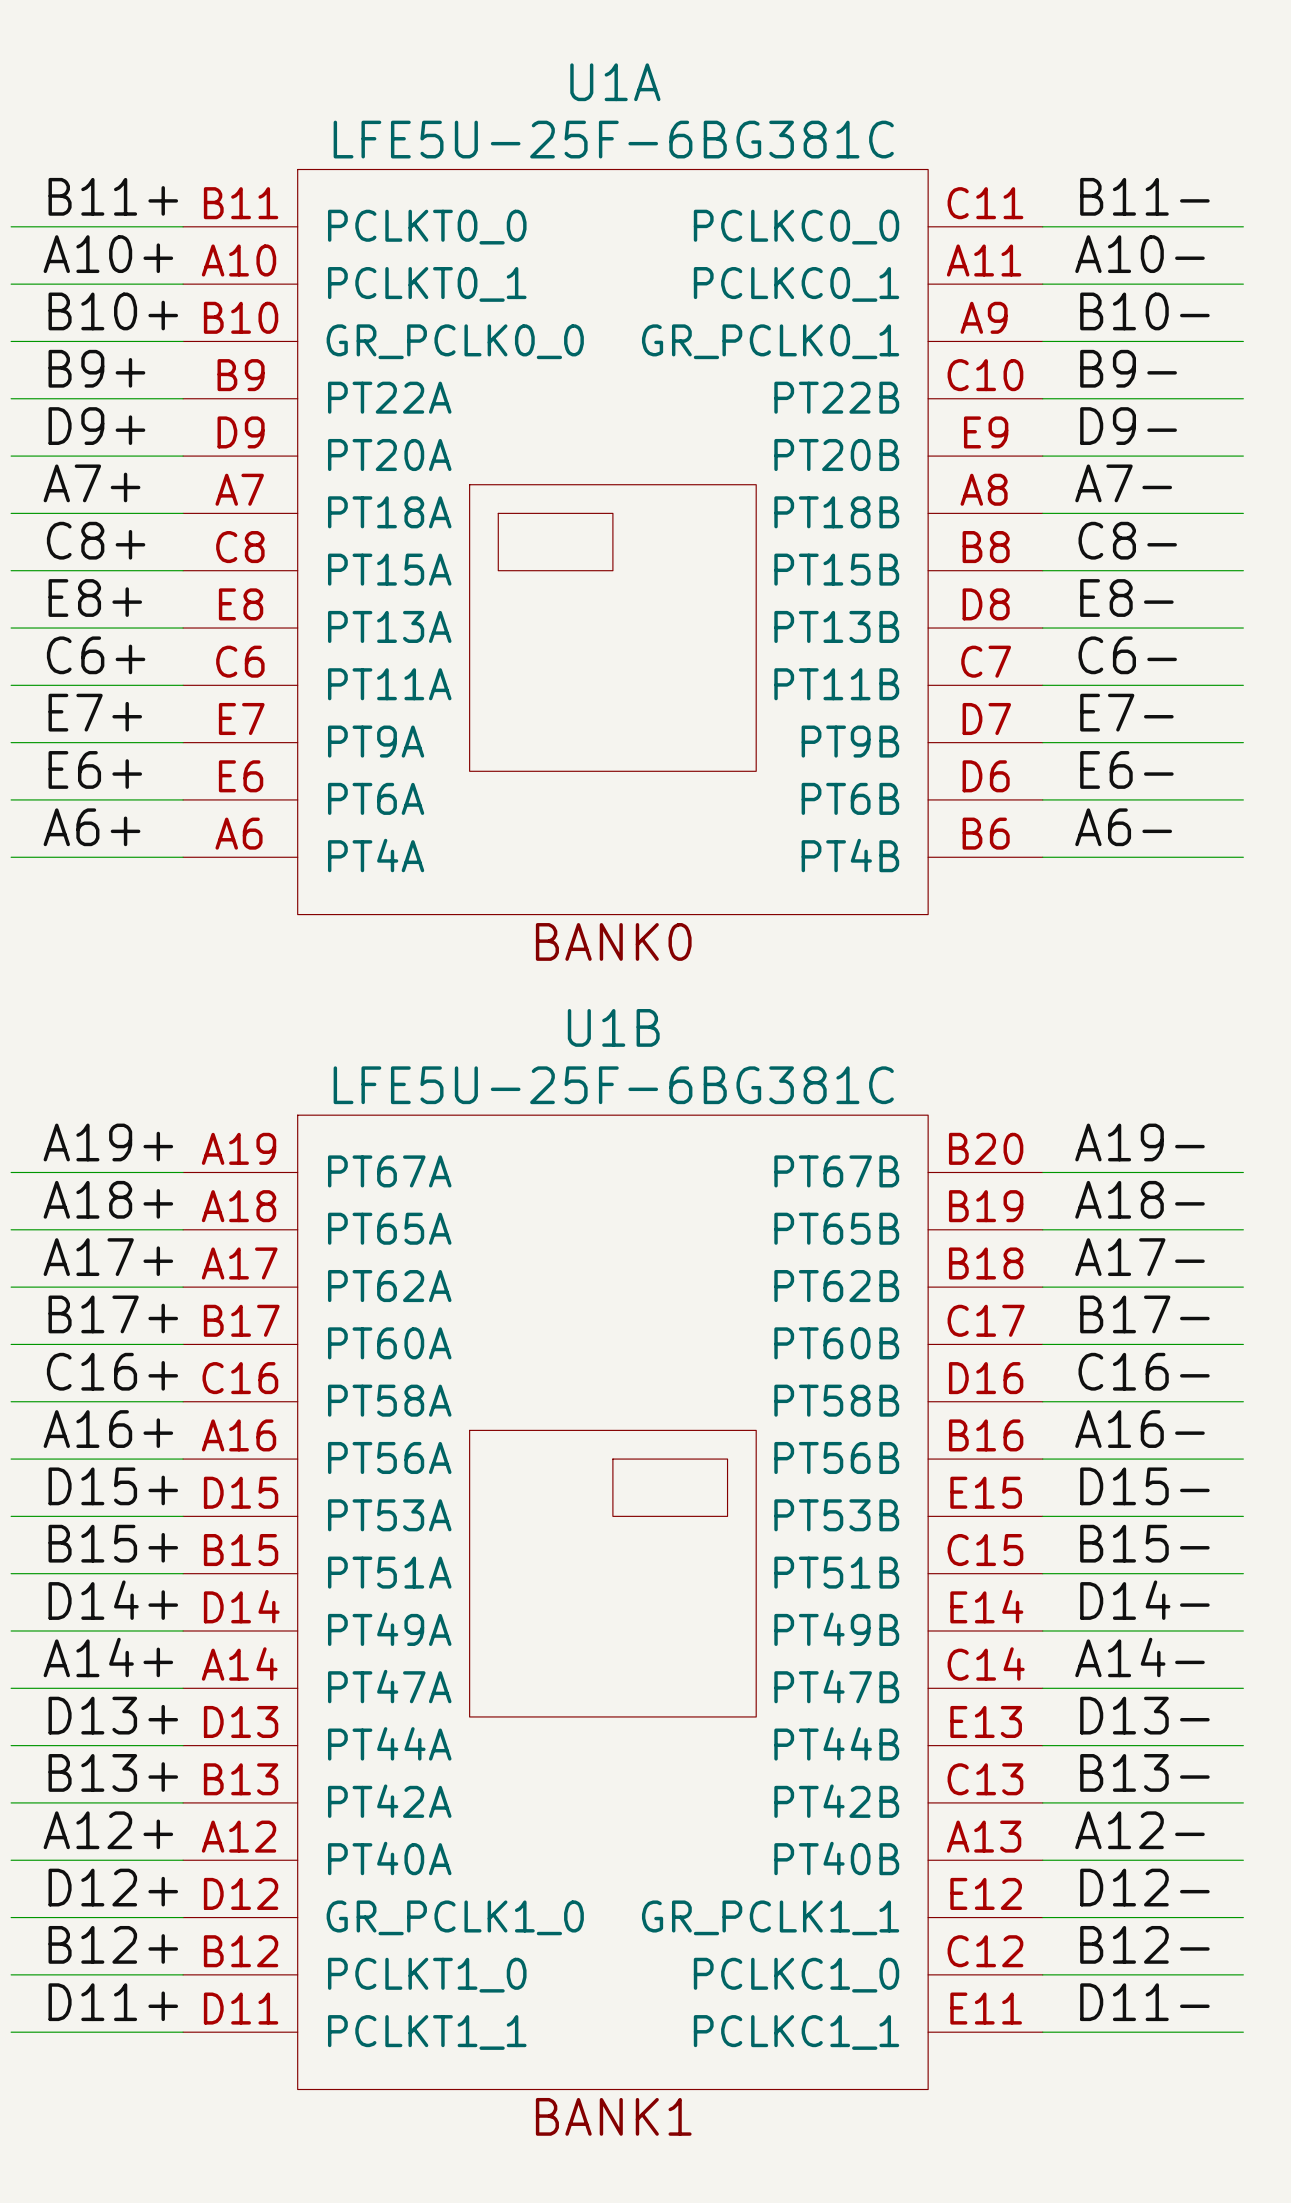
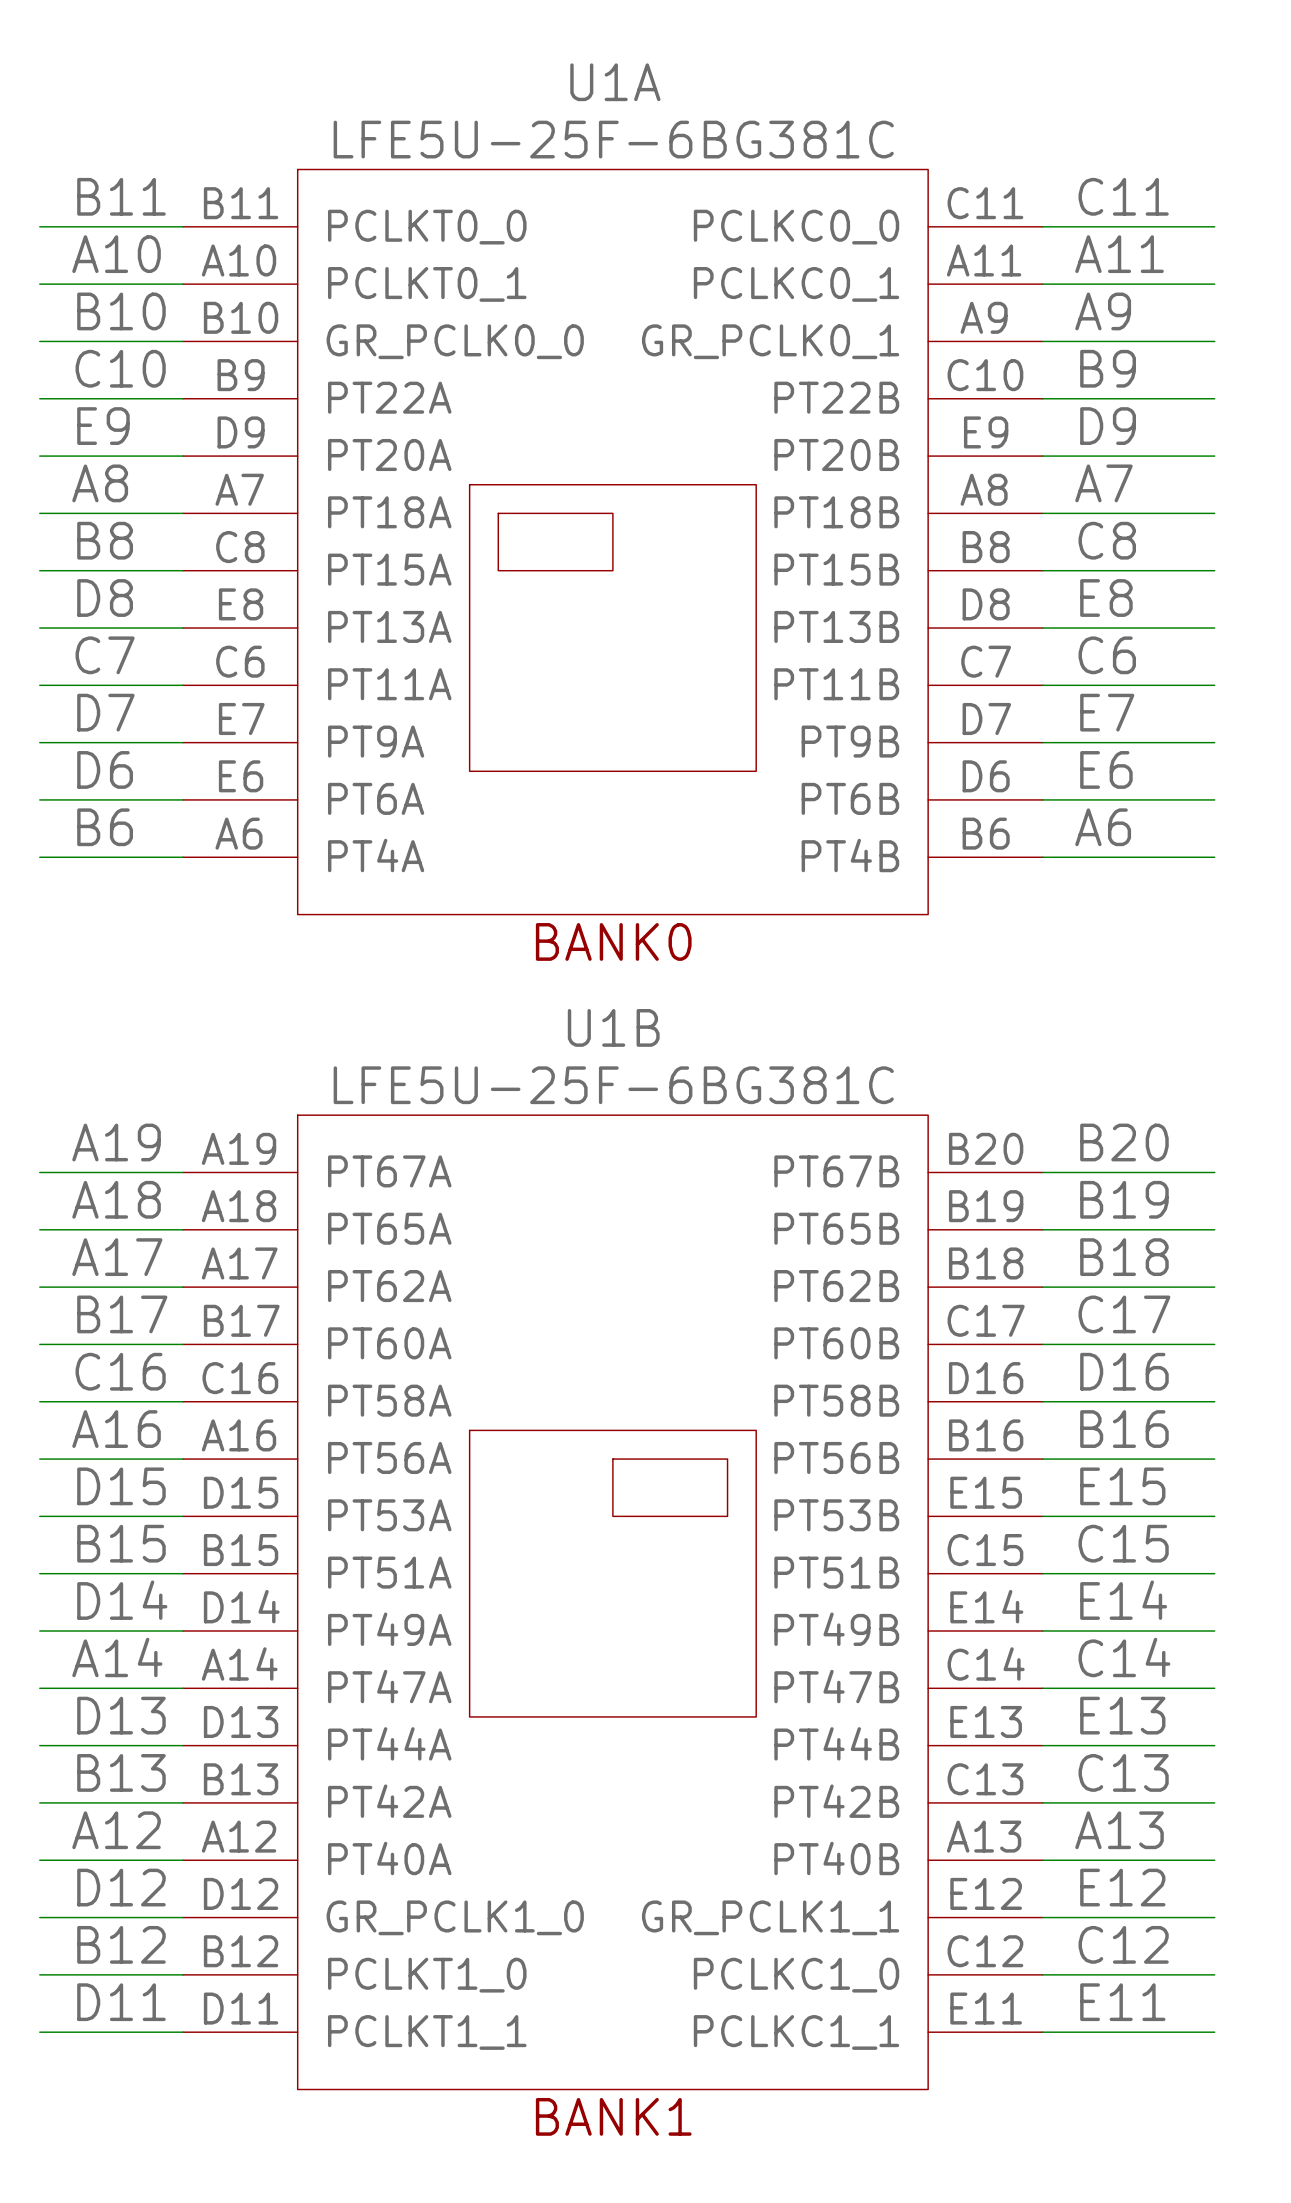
label: B11+ (113, 196) -> B11 (121, 196)
label: B11- (1144, 196) -> C11 (1123, 196)
wire: (11, 226) (39, 226) -> none
wire: (1214, 226) (1243, 226) -> none
label: A10+ (108, 254) -> A10 (116, 254)
label: A10- (1140, 254) -> A11 (1119, 254)
wire: (11, 284) (39, 284) -> none
wire: (1214, 284) (1243, 284) -> none
label: B10+ (113, 311) -> B10 (121, 311)
label: B10- (1144, 311) -> A9 (1103, 311)
wire: (11, 341) (39, 341) -> none
wire: (1214, 341) (1243, 341) -> none
label: B9+ (96, 368) -> none
label: none -> C10 (120, 368)
label: B9- (1128, 368) -> B9 (1108, 368)
wire: (11, 398) (39, 398) -> none
wire: (1214, 398) (1243, 398) -> none
label: D9+ (96, 426) -> none
label: none -> E9 (103, 426)
label: D9- (1128, 426) -> D9 (1108, 426)
wire: (11, 456) (39, 456) -> none
wire: (1214, 456) (1243, 456) -> none
label: A7+ (91, 483) -> none
label: none -> A8 (100, 483)
label: A7- (1123, 483) -> A7 (1103, 483)
wire: (11, 513) (39, 513) -> none
wire: (1214, 513) (1243, 513) -> none
label: C8+ (96, 540) -> none
label: none -> B8 (105, 540)
label: C8- (1127, 540) -> C8 (1107, 540)
wire: (11, 570) (39, 570) -> none
wire: (1214, 570) (1243, 570) -> none
label: E8+ (95, 598) -> none
label: none -> D8 (105, 598)
label: E8- (1126, 598) -> E8 (1106, 598)
wire: (11, 628) (39, 628) -> none
wire: (1214, 628) (1243, 628) -> none
label: C6+ (96, 655) -> none
label: none -> C7 (105, 655)
label: C6- (1127, 655) -> C6 (1107, 655)
wire: (11, 685) (39, 685) -> none
wire: (1214, 685) (1243, 685) -> none
label: E7+ (95, 712) -> none
label: none -> D7 (105, 712)
label: E7- (1126, 712) -> E7 (1107, 712)
wire: (11, 742) (39, 742) -> none
wire: (1214, 742) (1243, 742) -> none
label: E6+ (95, 769) -> none
label: none -> D6 (105, 769)
label: E6- (1126, 769) -> E6 (1106, 769)
wire: (11, 799) (39, 799) -> none
wire: (1214, 799) (1243, 799) -> none
label: A6+ (91, 827) -> none
label: none -> B6 (105, 827)
label: A6- (1123, 827) -> A6 (1103, 827)
wire: (11, 857) (39, 857) -> none
wire: (1214, 857) (1243, 857) -> none
label: A19+ (108, 1142) -> A19 (116, 1142)
label: A19- (1140, 1142) -> B20 (1124, 1142)
wire: (11, 1172) (39, 1172) -> none
wire: (1214, 1172) (1243, 1172) -> none
label: A18+ (108, 1199) -> A18 (116, 1199)
label: A18- (1140, 1199) -> B19 (1124, 1199)
wire: (11, 1229) (39, 1229) -> none
wire: (1214, 1229) (1243, 1229) -> none
label: A17+ (108, 1257) -> A17 (117, 1257)
label: A17- (1140, 1257) -> B18 (1124, 1257)
wire: (11, 1287) (39, 1287) -> none
wire: (1214, 1287) (1243, 1287) -> none
label: B17+ (113, 1314) -> B17 (122, 1314)
label: B17- (1144, 1314) -> C17 (1124, 1314)
wire: (11, 1344) (39, 1344) -> none
wire: (1214, 1344) (1243, 1344) -> none
label: C16+ (112, 1371) -> C16 (120, 1371)
label: C16- (1144, 1371) -> D16 (1124, 1371)
wire: (11, 1401) (39, 1401) -> none
wire: (1214, 1401) (1243, 1401) -> none
label: A16+ (108, 1429) -> A16 (116, 1429)
label: A16- (1140, 1429) -> B16 (1124, 1429)
wire: (11, 1459) (39, 1459) -> none
wire: (1214, 1459) (1243, 1459) -> none
label: D15+ (113, 1486) -> D15 (121, 1486)
label: D15- (1144, 1486) -> E15 (1122, 1486)
wire: (11, 1516) (39, 1516) -> none
wire: (1214, 1516) (1243, 1516) -> none
label: B15+ (113, 1543) -> B15 (121, 1543)
label: B15- (1144, 1543) -> C15 (1123, 1543)
wire: (11, 1573) (39, 1573) -> none
wire: (1214, 1573) (1243, 1573) -> none
label: D14+ (113, 1600) -> D14 (122, 1600)
label: D14- (1144, 1600) -> E14 (1123, 1600)
wire: (11, 1630) (39, 1630) -> none
wire: (1214, 1630) (1243, 1630) -> none
label: A14+ (108, 1657) -> A14 (117, 1657)
label: A14- (1140, 1657) -> C14 (1124, 1657)
wire: (11, 1688) (39, 1688) -> none
wire: (1214, 1688) (1243, 1688) -> none
label: D13+ (113, 1715) -> D13 (121, 1715)
label: D13- (1144, 1715) -> E13 (1122, 1715)
wire: (11, 1745) (39, 1745) -> none
wire: (1214, 1745) (1243, 1745) -> none
label: B13+ (113, 1772) -> B13 (121, 1772)
label: B13- (1144, 1772) -> C13 (1123, 1772)
wire: (11, 1802) (39, 1802) -> none
wire: (1214, 1802) (1243, 1802) -> none
label: A12+ (108, 1830) -> A12 (116, 1830)
label: A12- (1140, 1830) -> A13 (1119, 1830)
wire: (11, 1860) (39, 1860) -> none
wire: (1214, 1860) (1243, 1860) -> none
label: D12+ (113, 1887) -> D12 (121, 1887)
label: D12- (1144, 1887) -> E12 (1122, 1887)
wire: (11, 1917) (39, 1917) -> none
wire: (1214, 1917) (1243, 1917) -> none
label: B12+ (113, 1944) -> B12 (121, 1944)
label: B12- (1144, 1944) -> C12 (1123, 1944)
wire: (11, 1974) (39, 1974) -> none
wire: (1214, 1974) (1243, 1974) -> none
label: D11+ (113, 2002) -> D11 (121, 2002)
label: D11- (1144, 2002) -> E11 (1122, 2002)
wire: (11, 2032) (39, 2032) -> none
wire: (1214, 2032) (1243, 2032) -> none

